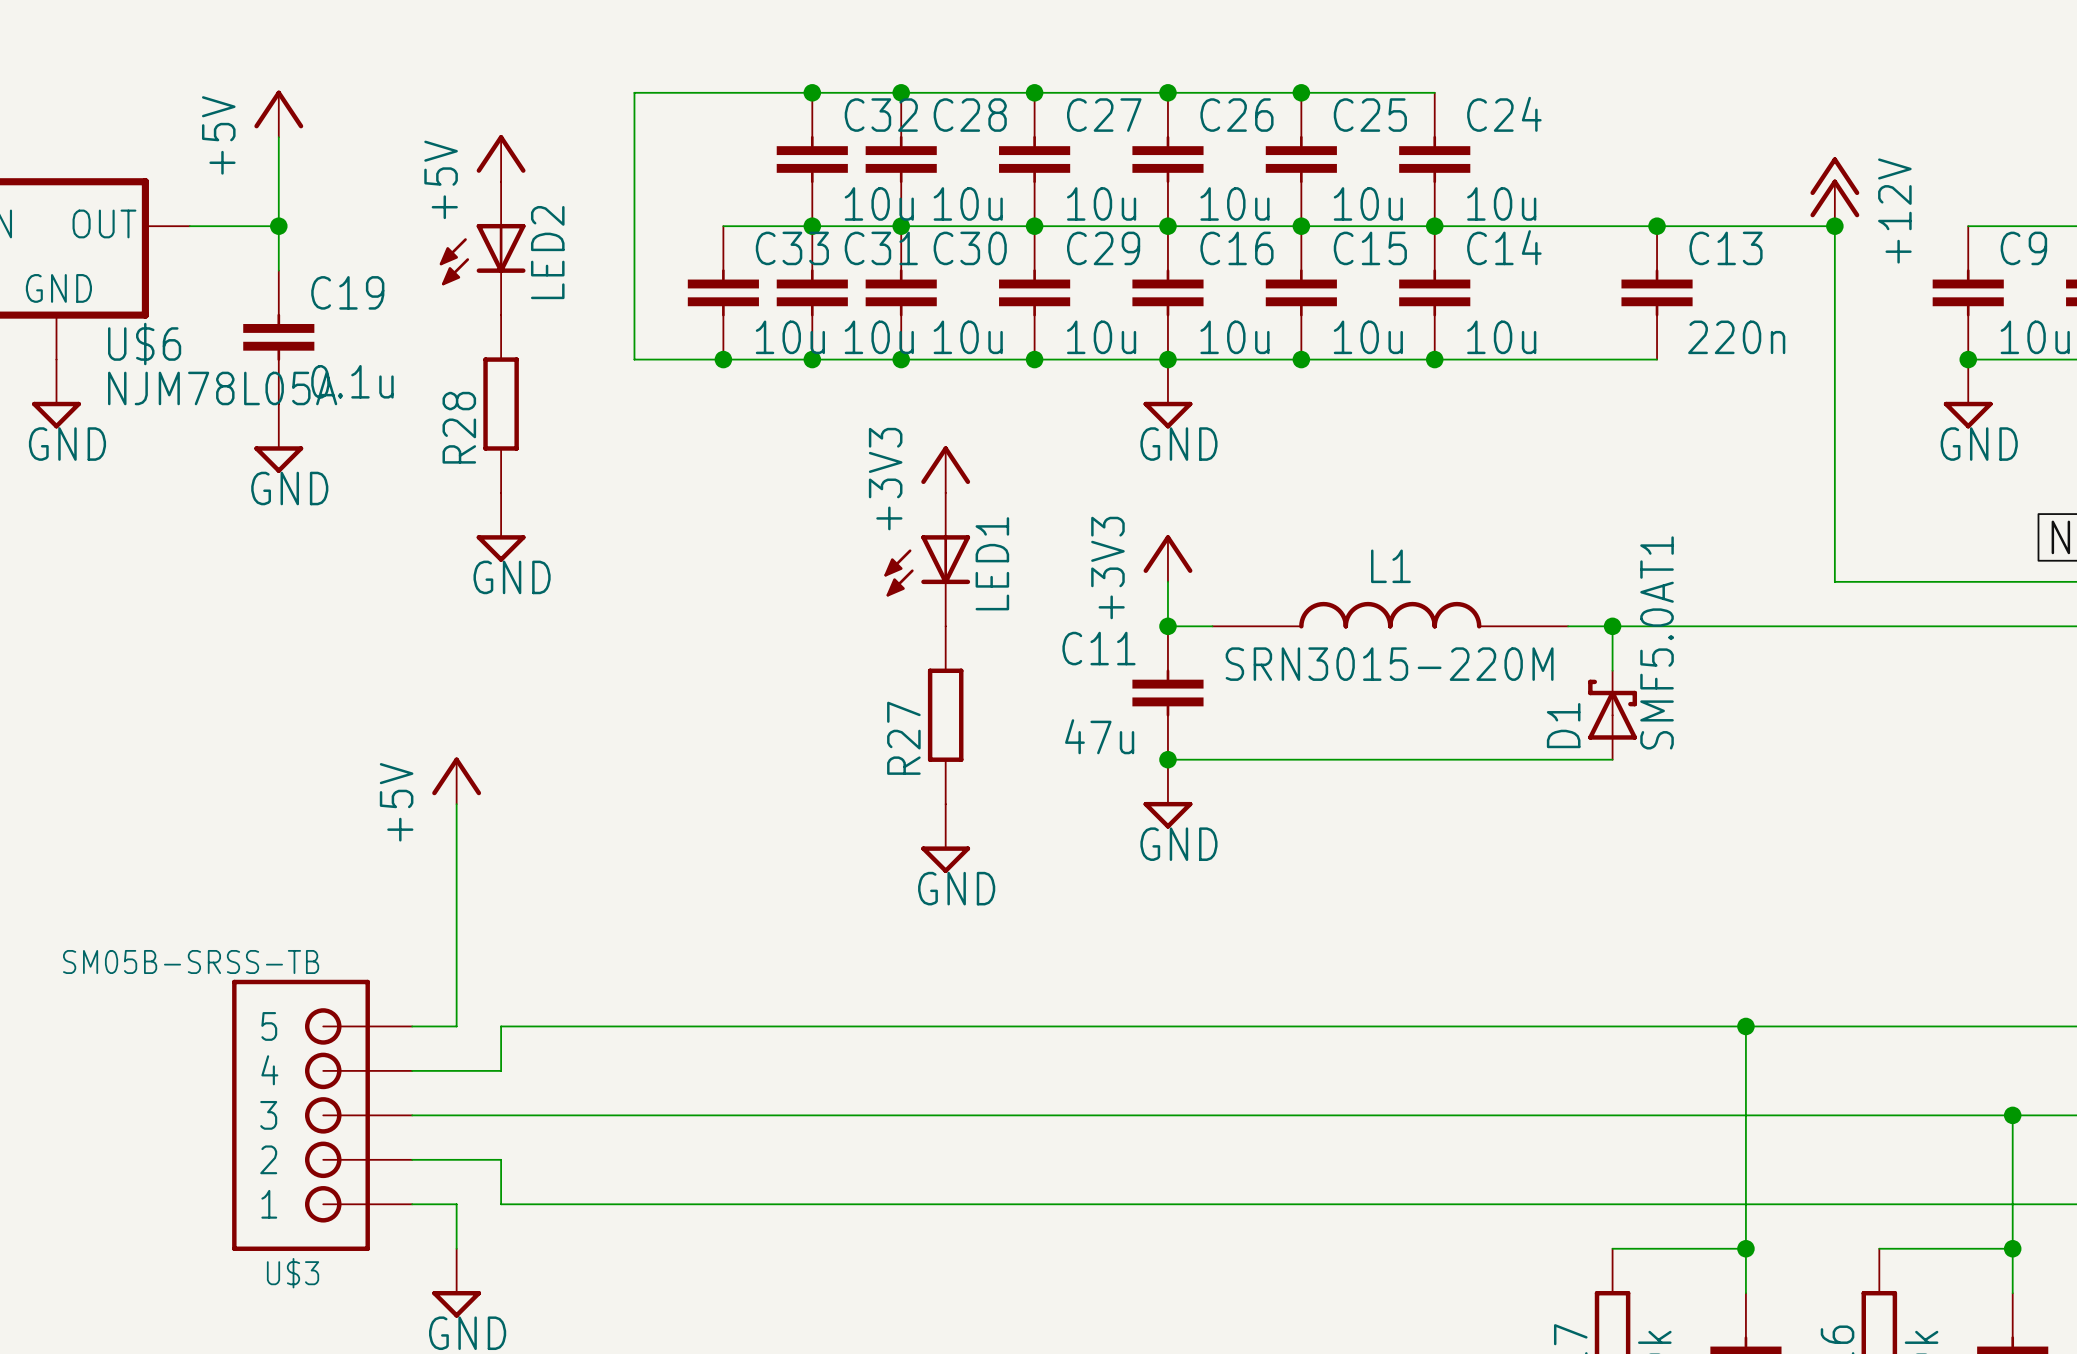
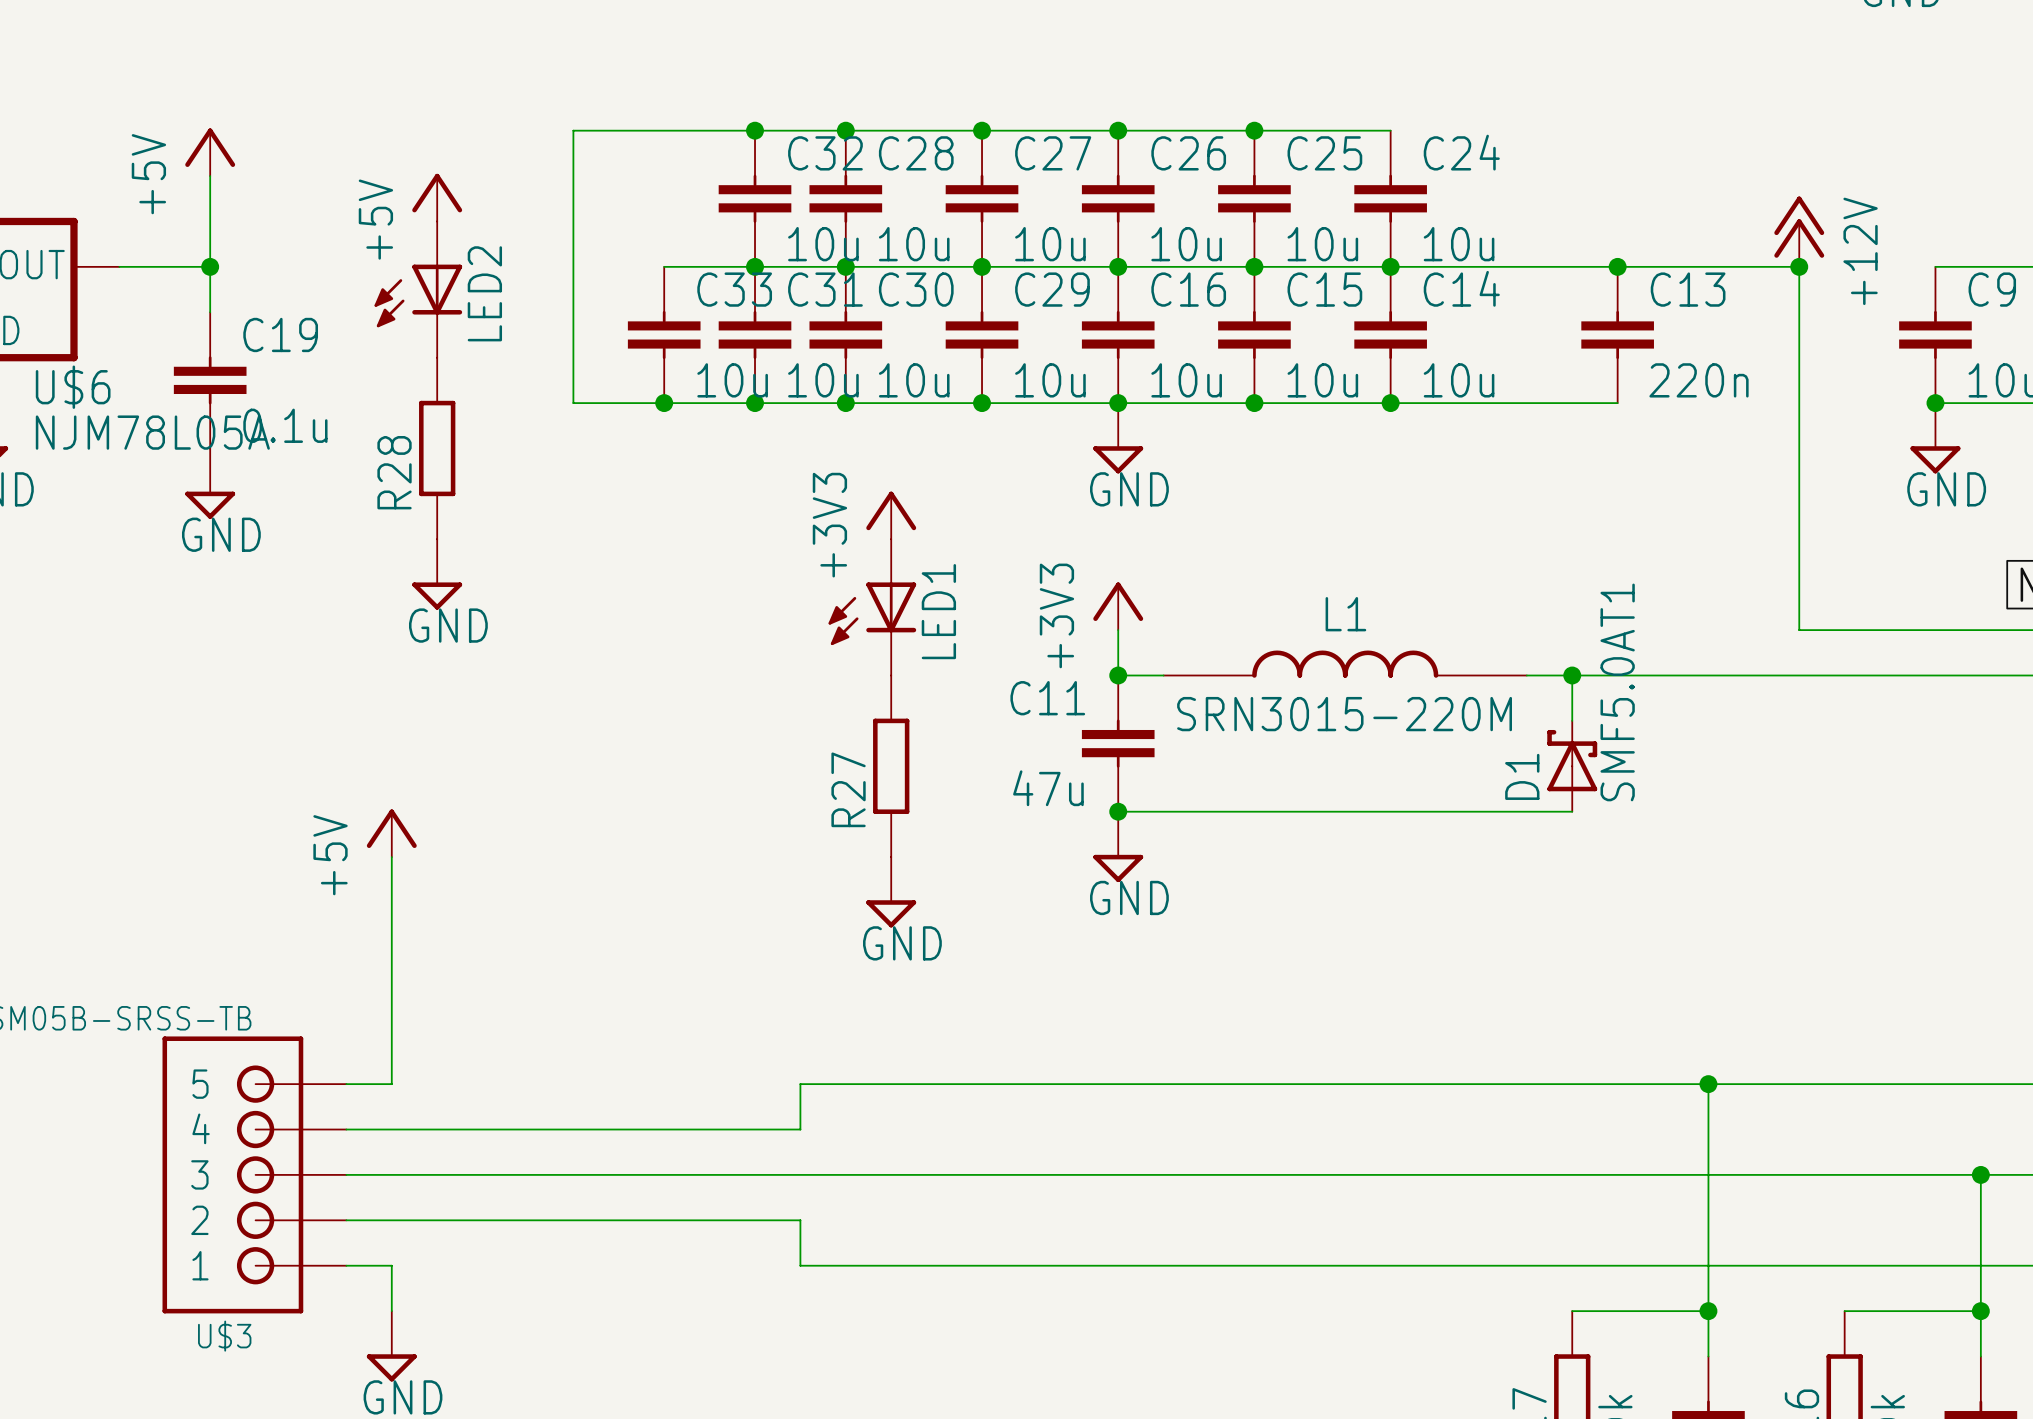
wire: (856, 1026) (501, 1026) (501, 1070) -> (800, 1084) (800, 1129) (437, 1129)
wire: (501, 1159) (501, 1204) (856, 1204) -> (437, 1220) (800, 1220) (800, 1265)

